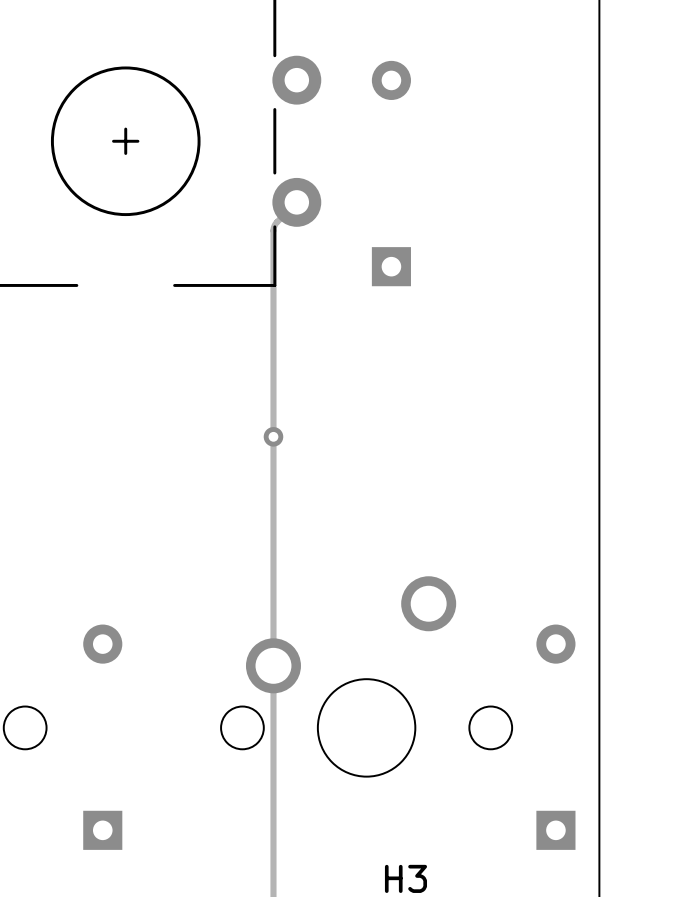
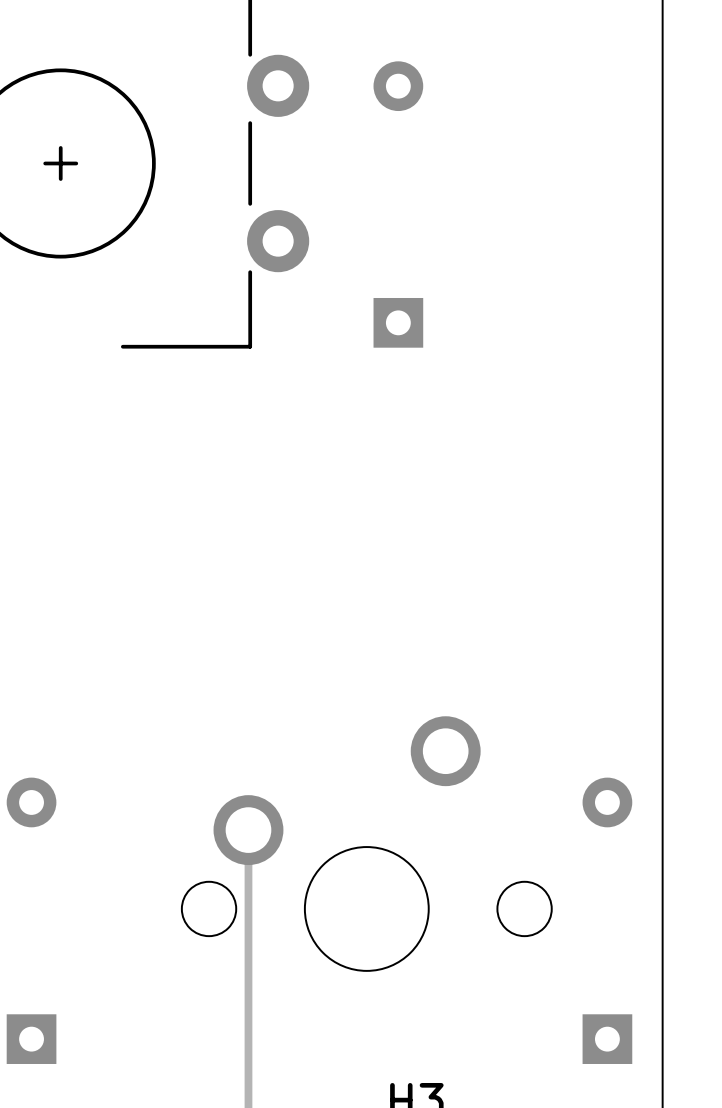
track: (296, 202) (276, 223) (273, 229) (273, 665) -> none
via: (273, 436) -> none

